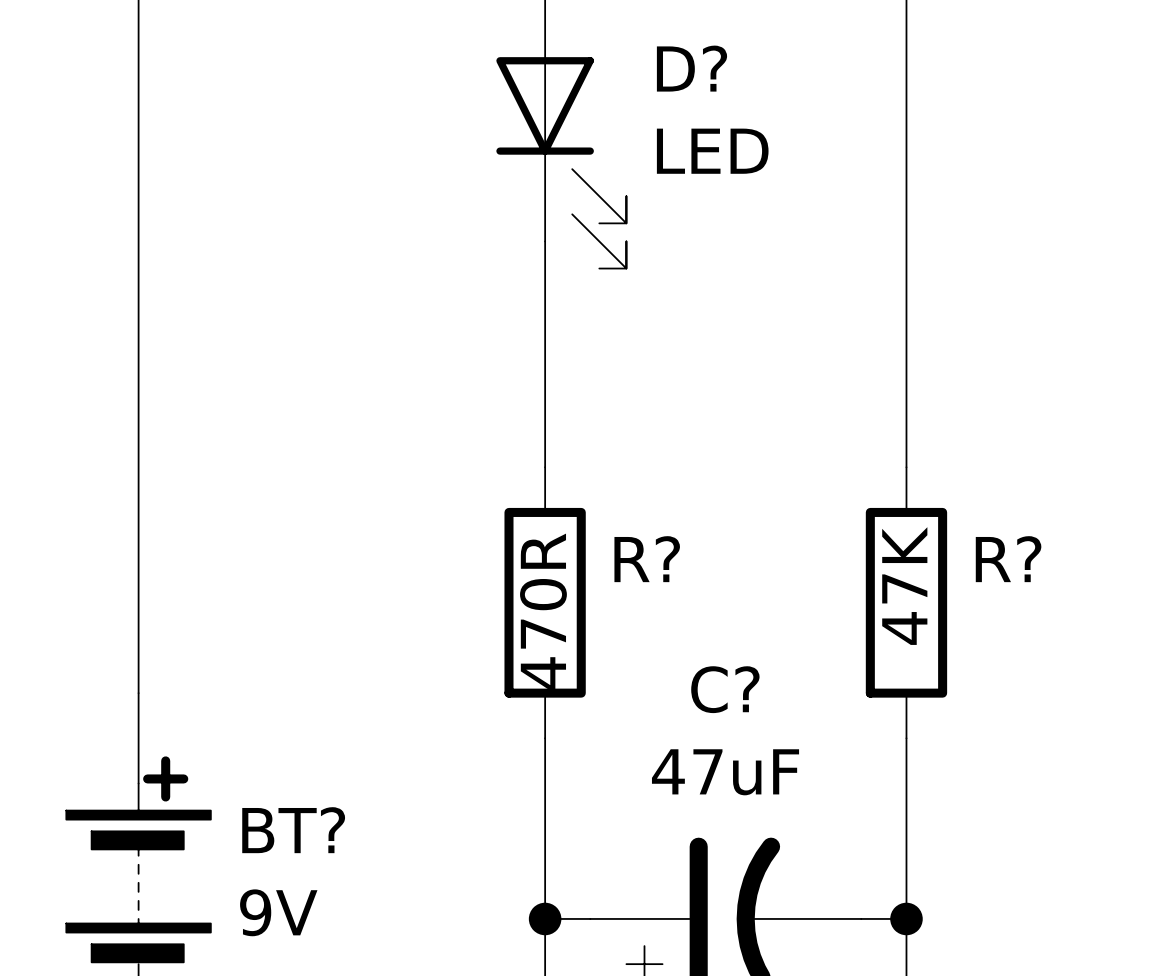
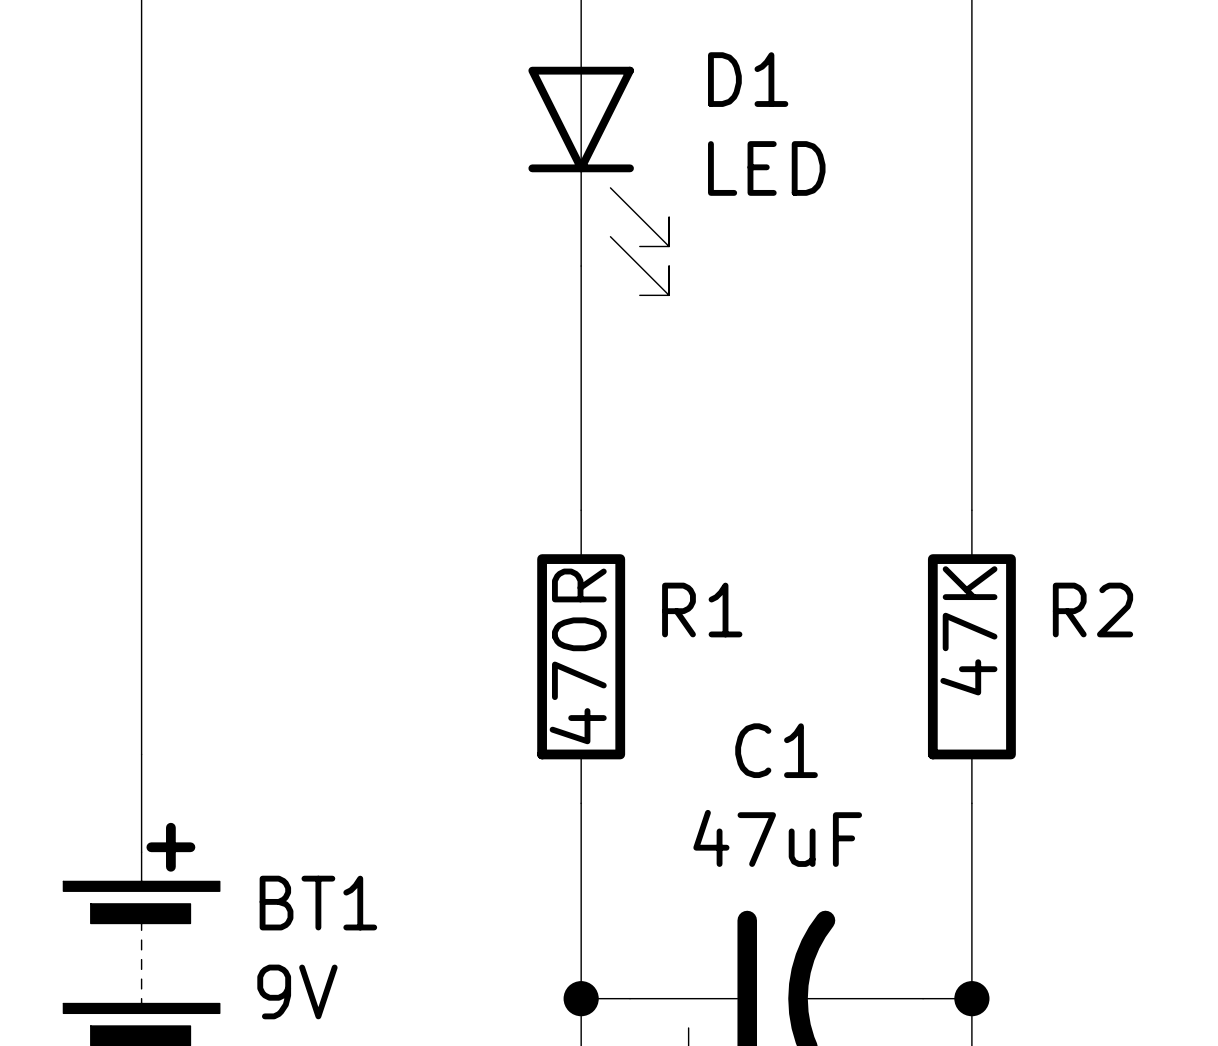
D? name: D? (691, 68) -> D1 (748, 79)
R? name: R? (647, 559) -> R1 (702, 610)
R? name: R? (1008, 559) -> R2 (1092, 610)
C? name: C? (725, 689) -> C1 (776, 750)
BT? name: BT? (293, 830) -> BT1 (318, 903)

